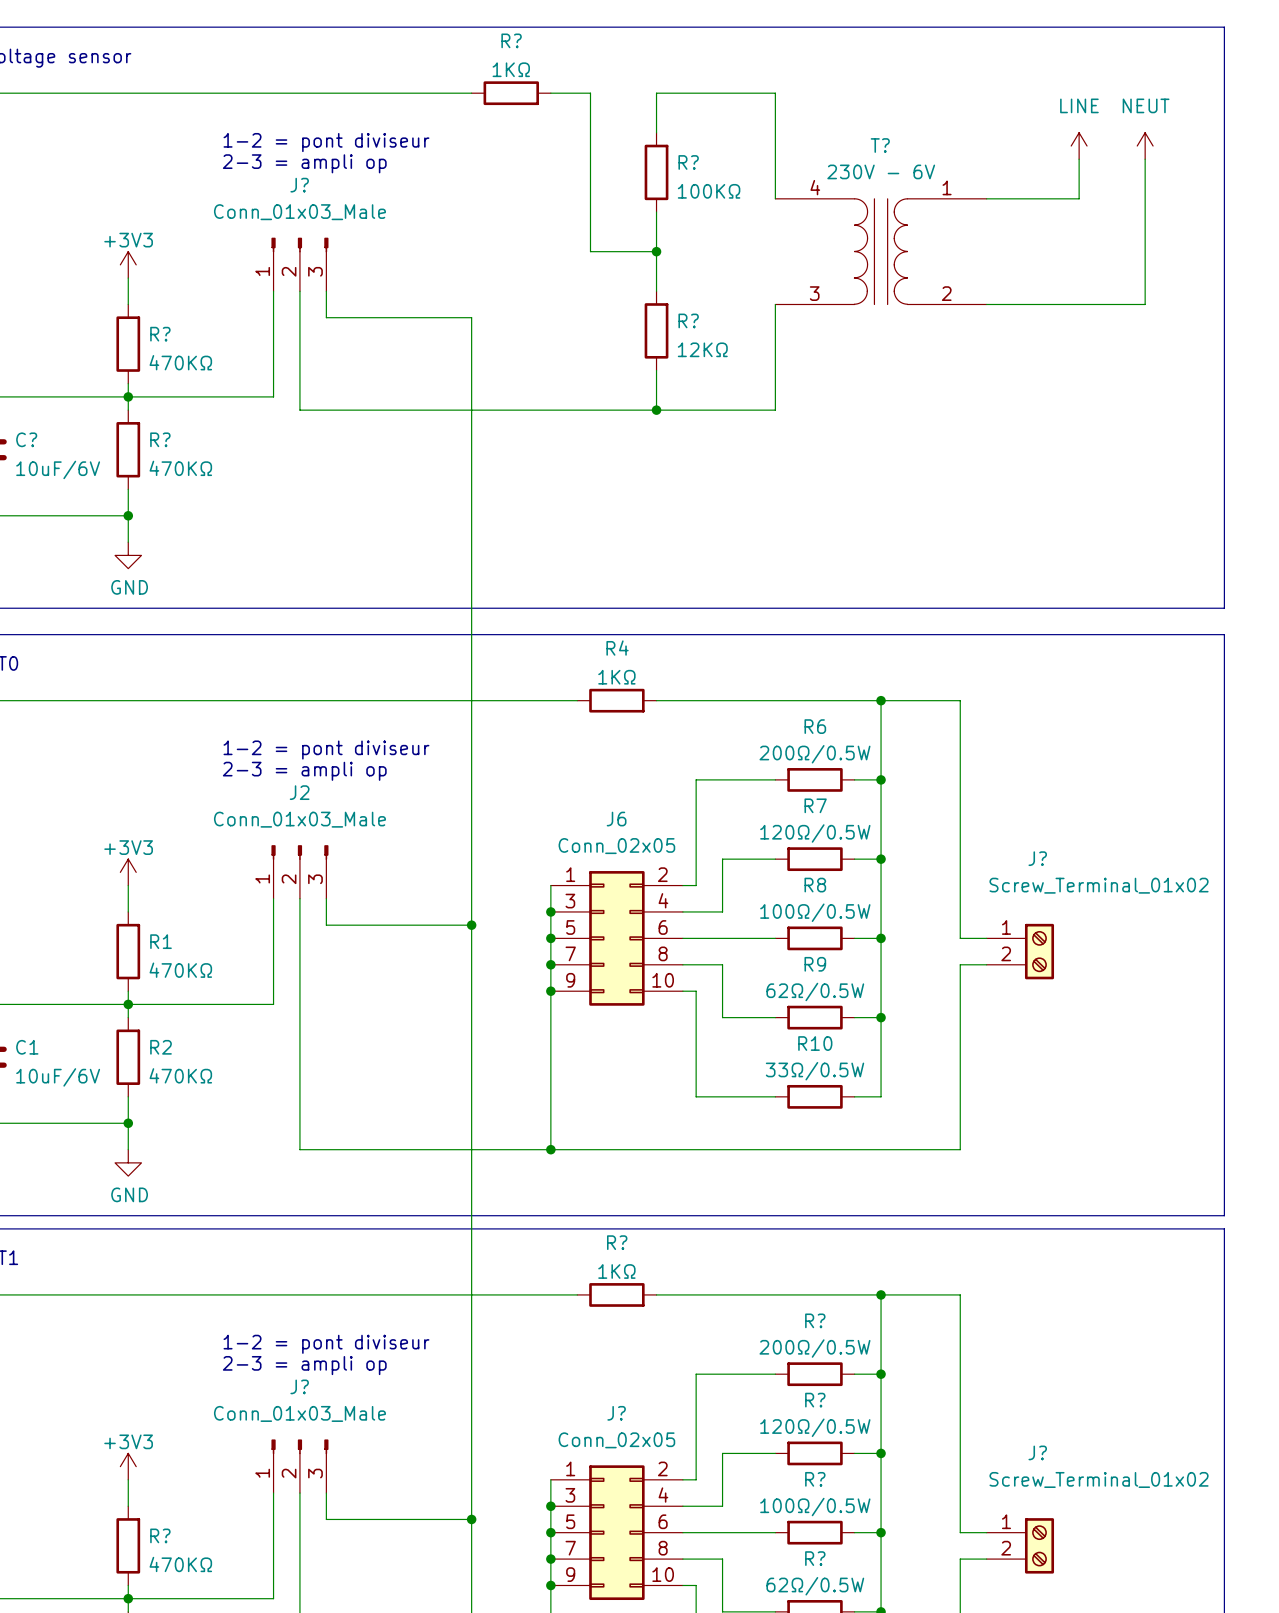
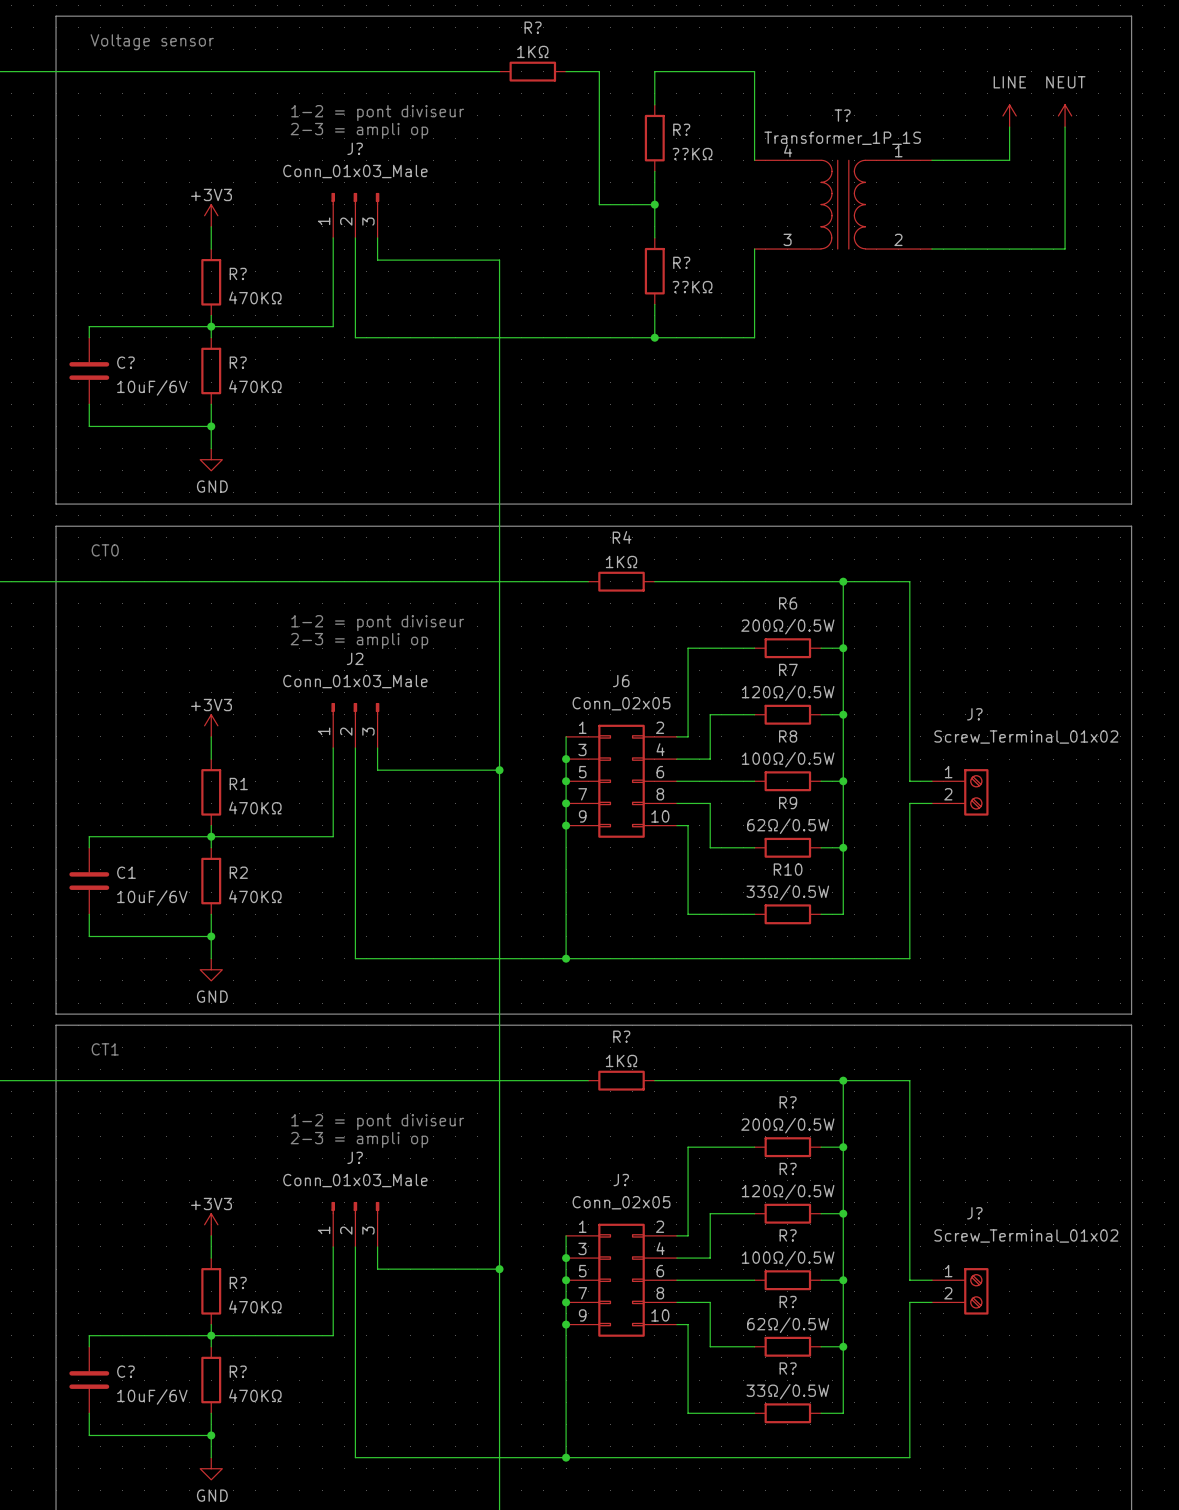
T? value: 230V - 6V (881, 171) -> Transformer_1P_1S (842, 138)
R? value: 100KΩ (709, 191) -> ??KΩ (692, 154)
R? value: 12KΩ (702, 349) -> ??KΩ (692, 287)

